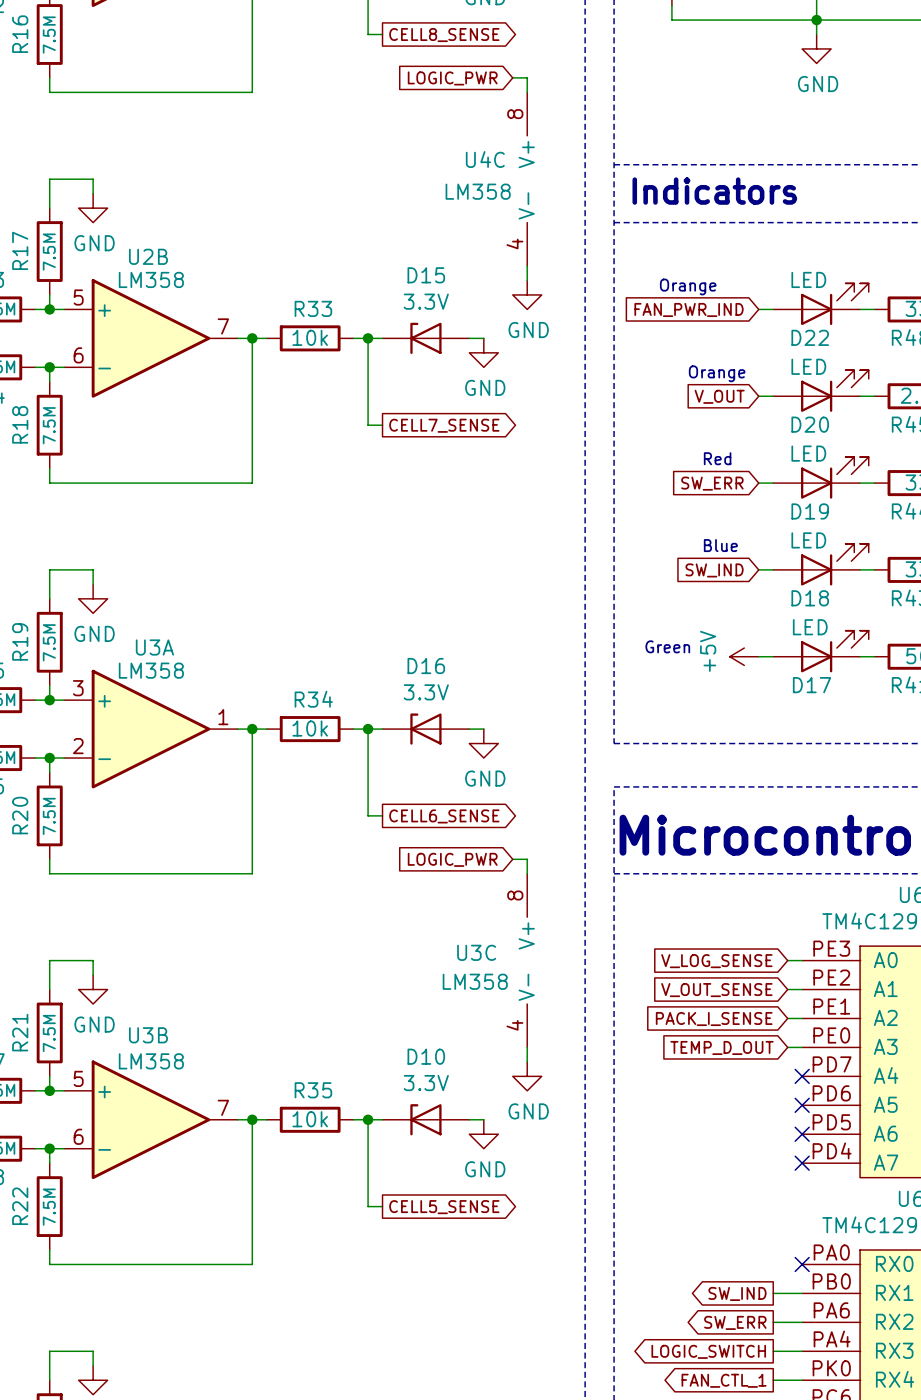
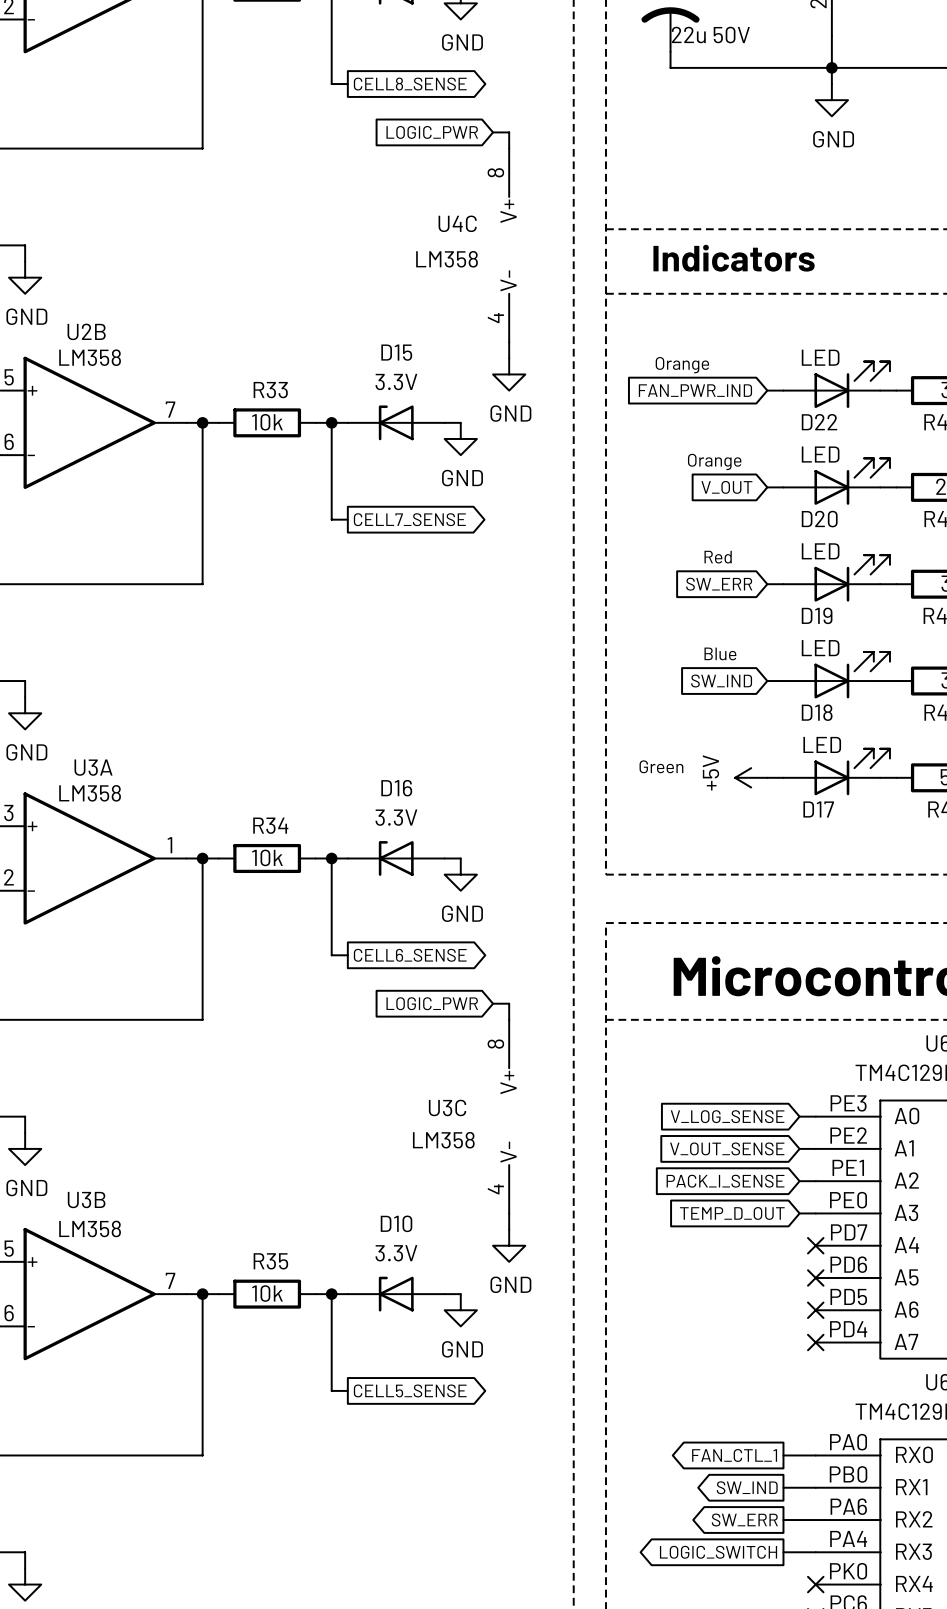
no-connect mark: (802, 1264) -> none
global label position: FAN_CTL_1 (724, 1380) -> FAN_CTL_1 (734, 1455)
wire: (773, 1380) (802, 1380) -> (783, 1455) (815, 1455)
no-connect mark: none -> (815, 1584)

